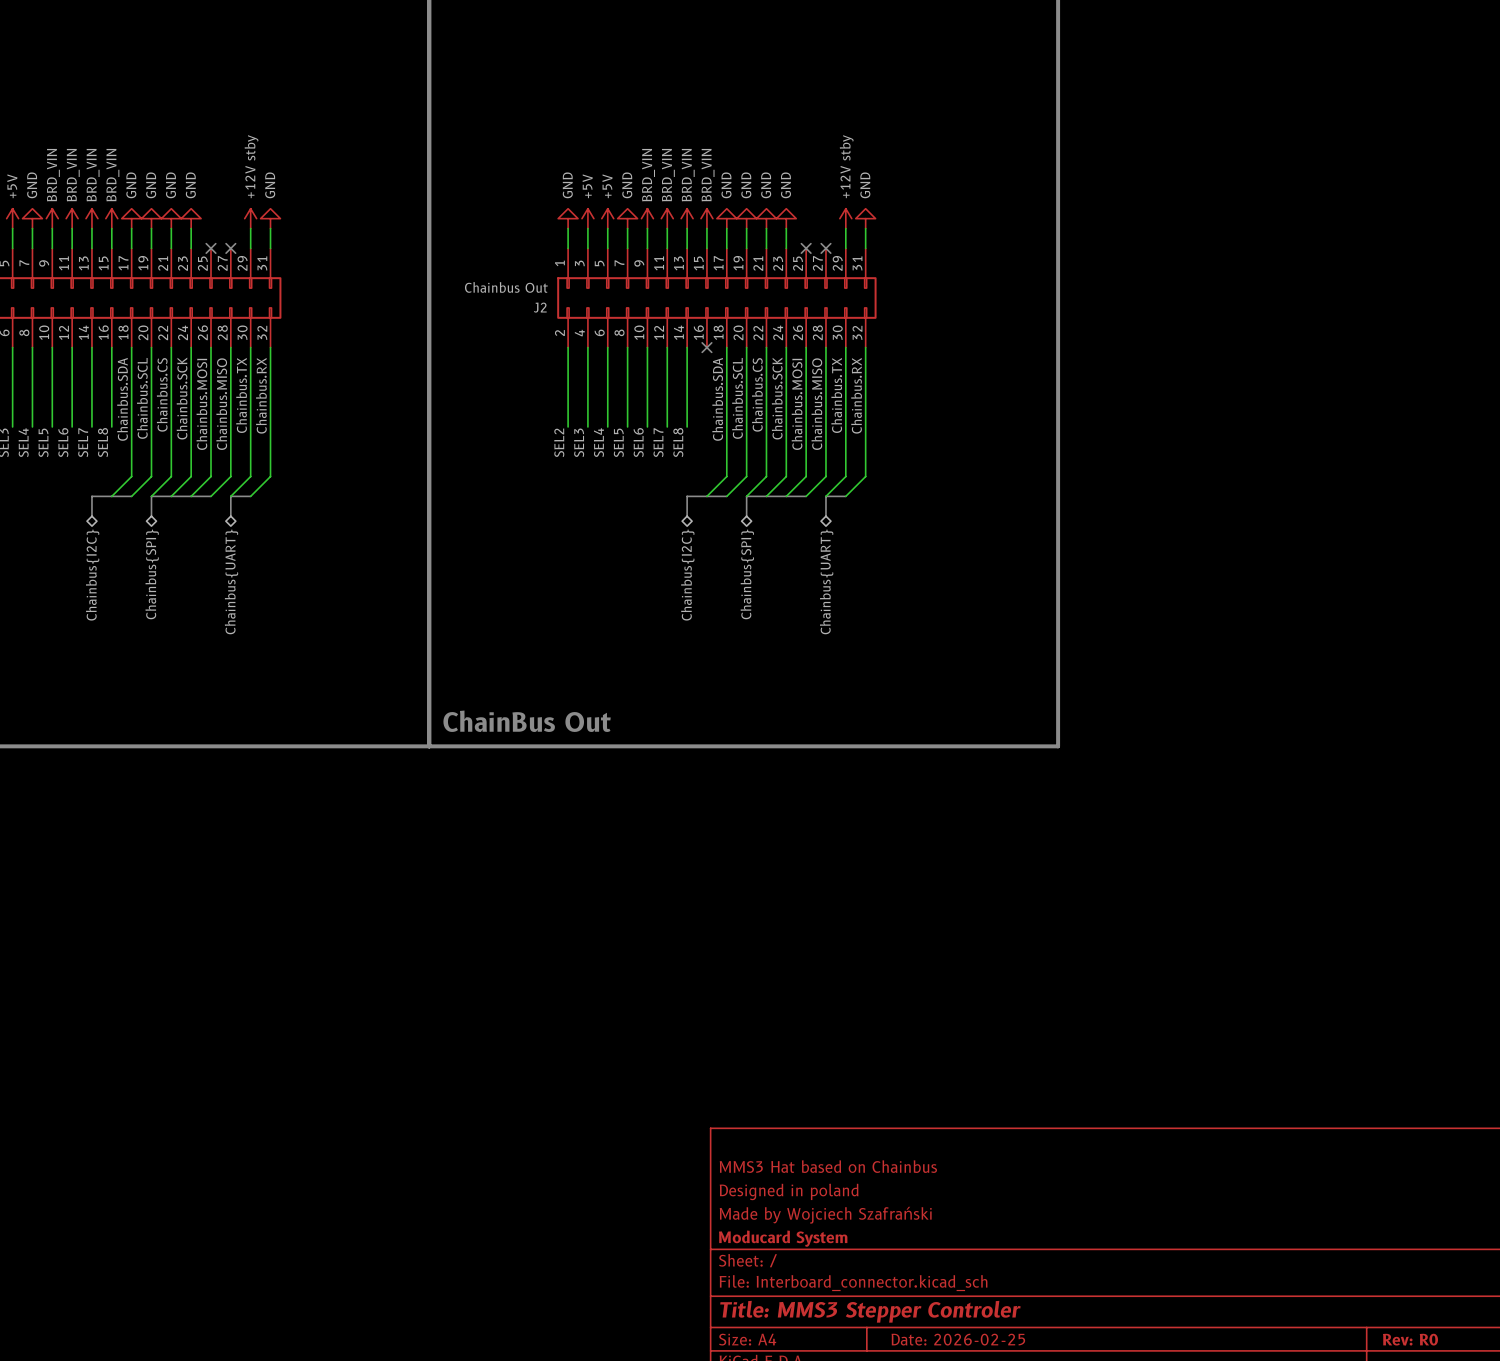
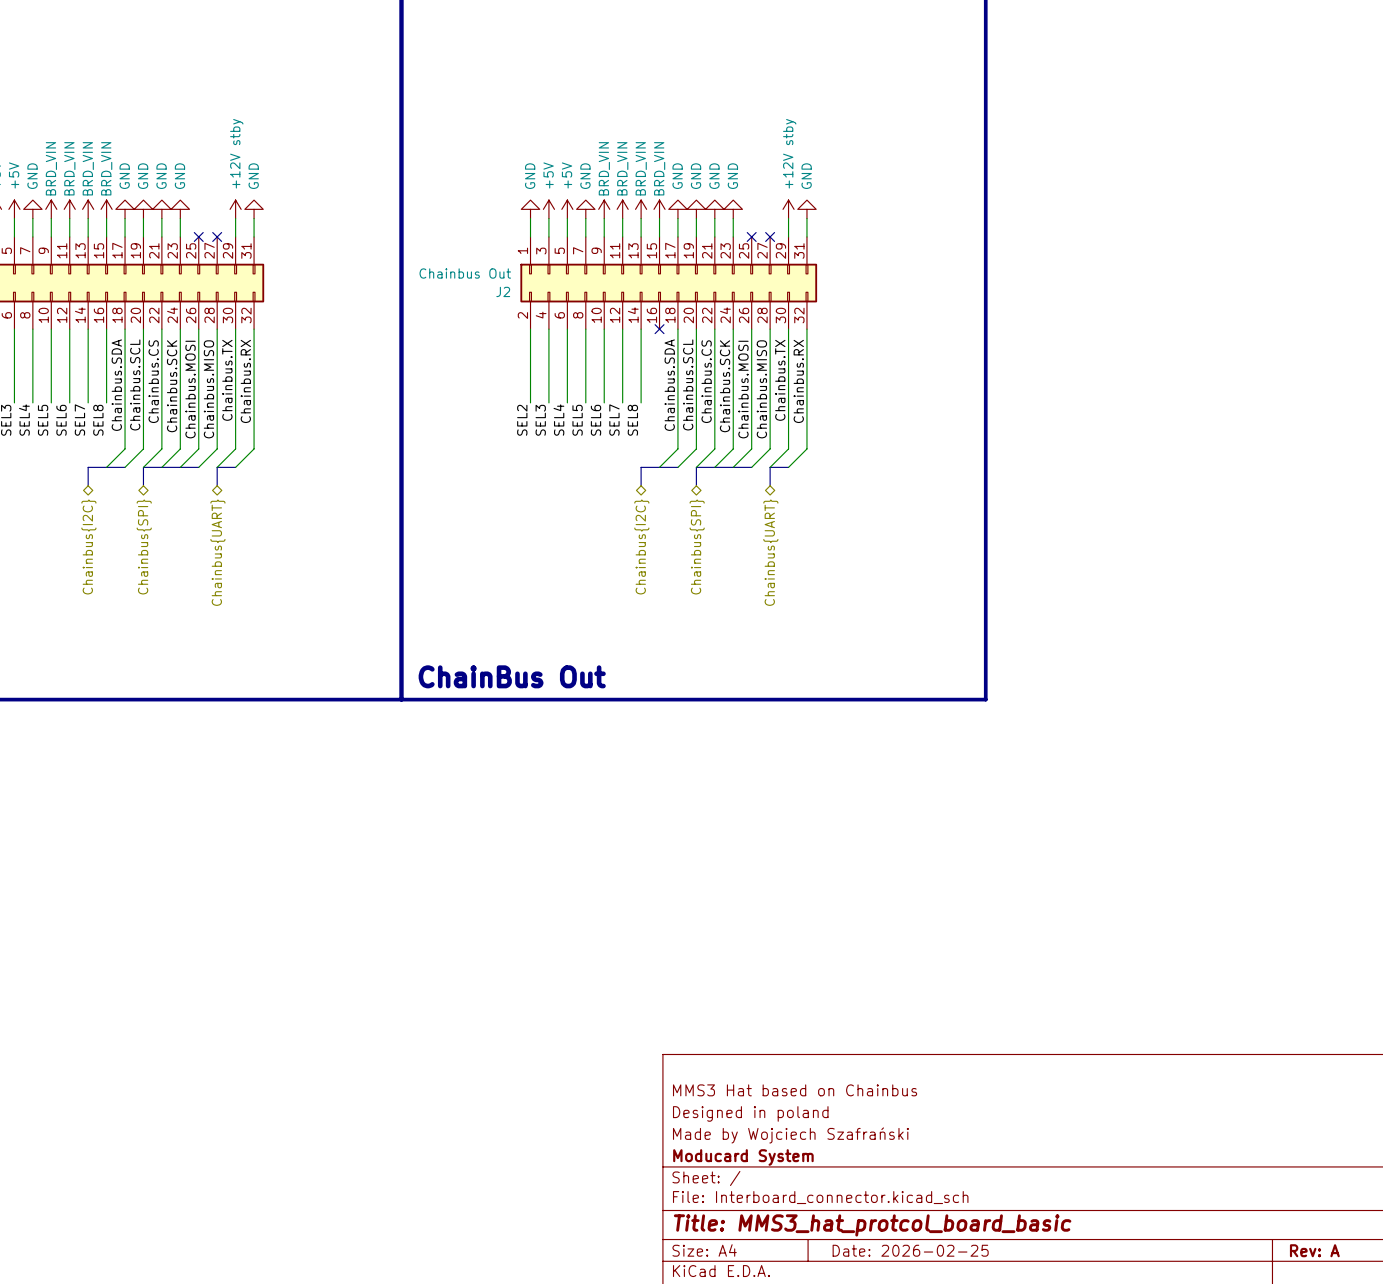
title block: Title: MMS3 Stepper Controler (870, 1311) -> Title: MMS3_hat_protcol_board_basic (872, 1225)
title block: Rev: R0 (1410, 1339) -> Rev: A (1314, 1250)

